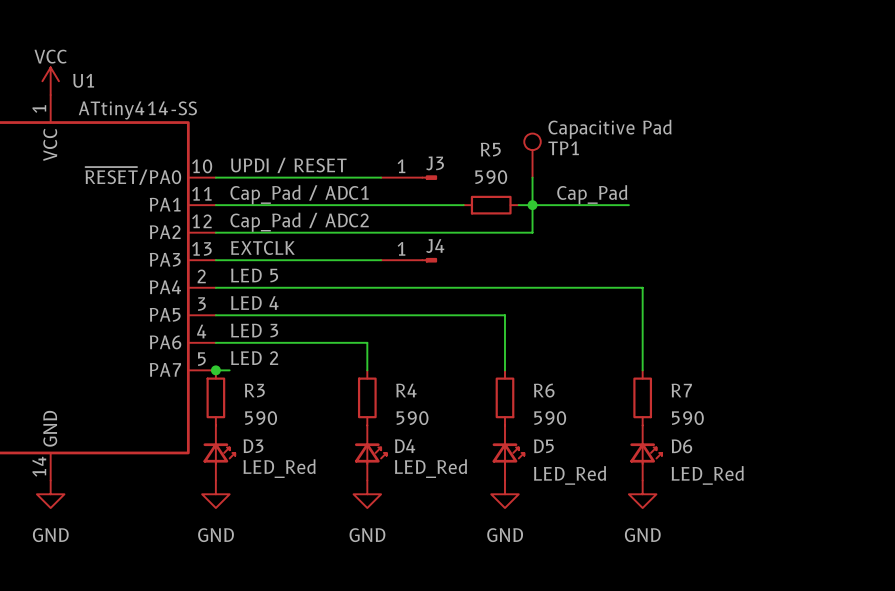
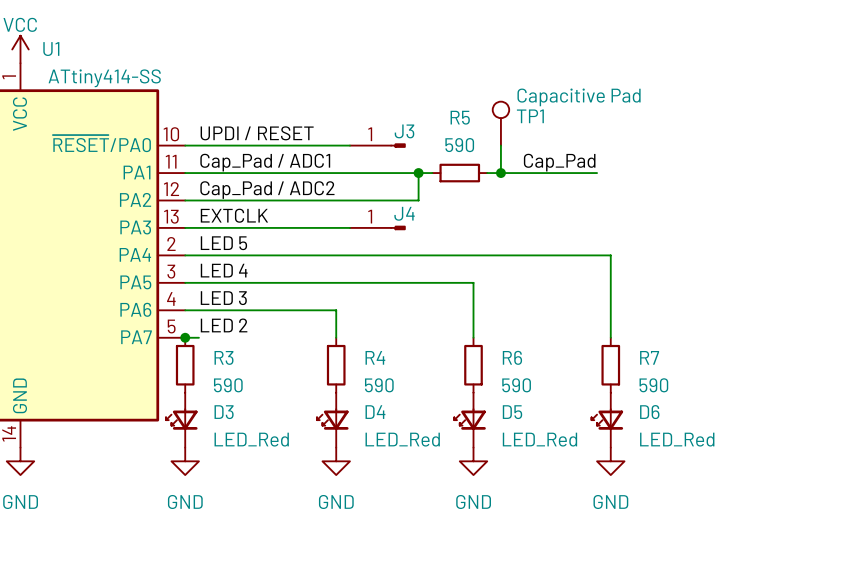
junction: none -> (418, 173)
wire: (532, 205) (532, 232) (449, 232) -> (418, 173) (418, 200)
D3 rotation: 0° (219, 453) -> 180° (181, 419)
D4 rotation: 0° (370, 453) -> 180° (332, 419)
D5 rotation: 0° (508, 453) -> 180° (470, 419)
D6 rotation: 0° (646, 453) -> 180° (607, 419)

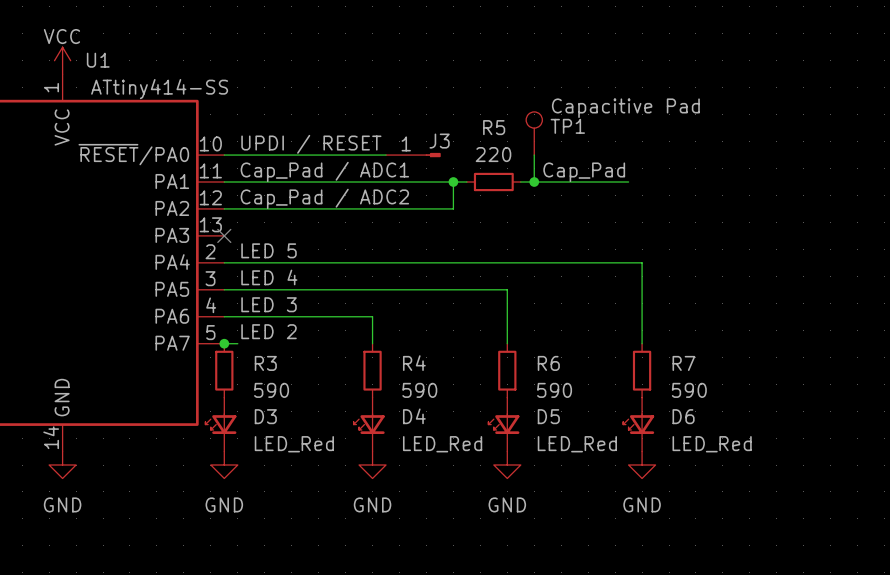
R5 value: 590 (459, 145) -> 220 (493, 154)
label: EXTCLK (234, 215) -> none
wire: (185, 227) (349, 227) -> none
no-connect mark: none -> (224, 235)
J4: (377, 227) -> none

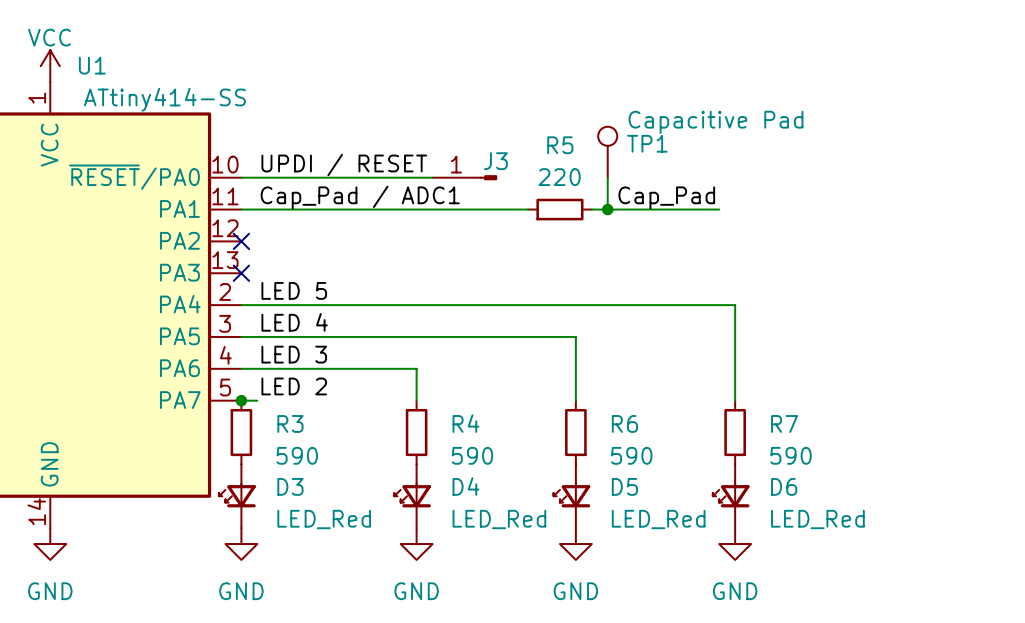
wire: (453, 182) (453, 208) (224, 208) -> none
junction: (453, 182) -> none
label: Cap_Pad / ADC2 (324, 198) -> none
no-connect mark: none -> (241, 241)

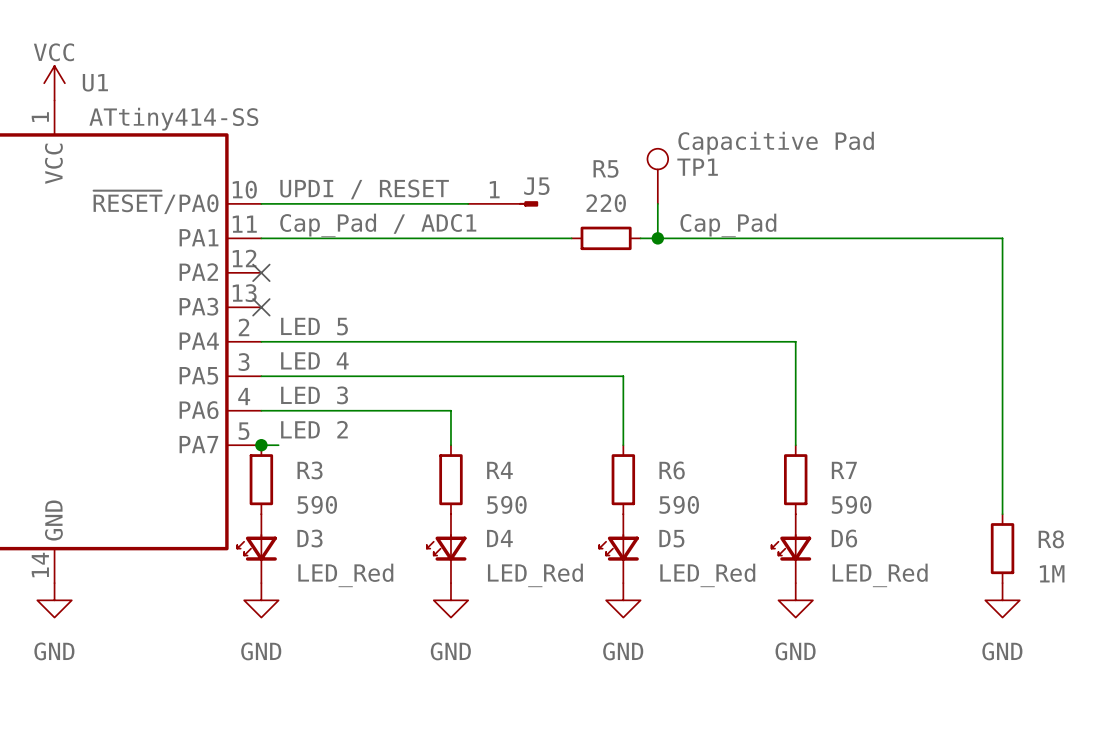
J3 name: J3 (495, 161) -> J5 (536, 186)
wire: none -> (778, 238) (1002, 238) (1002, 514)
R8: none -> 1M (1002, 548)
power symbol: none -> GND (1002, 600)

